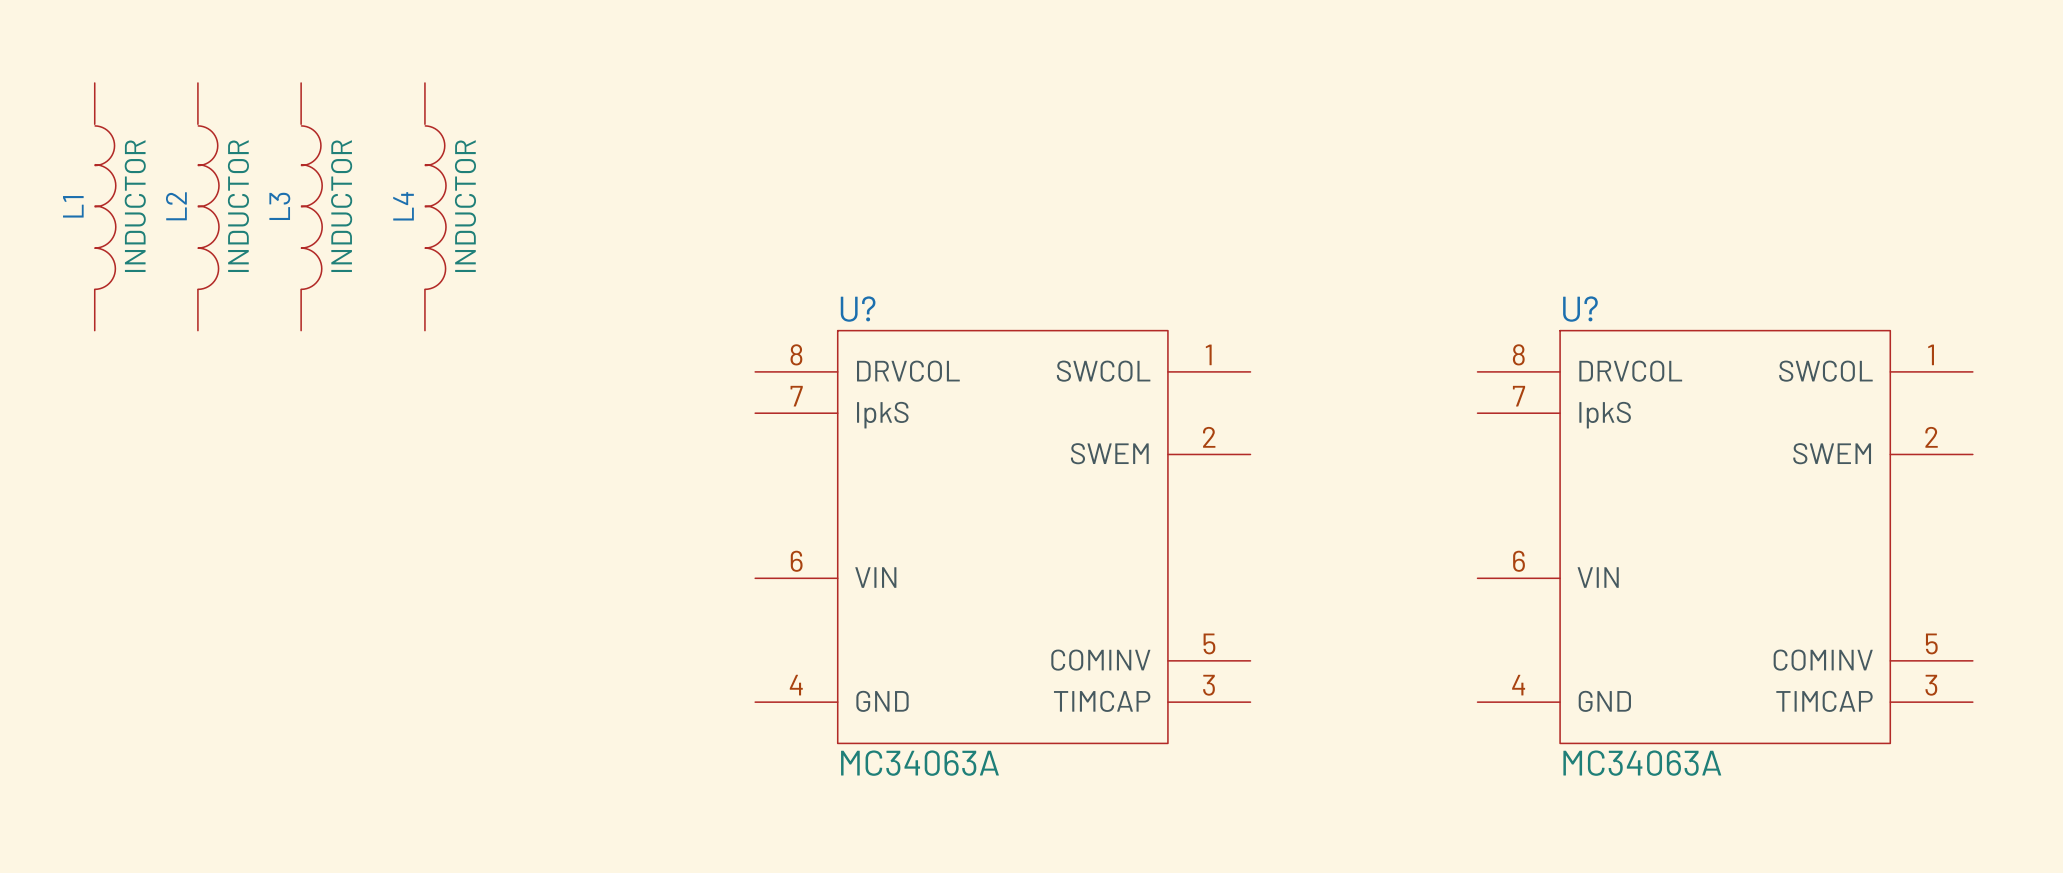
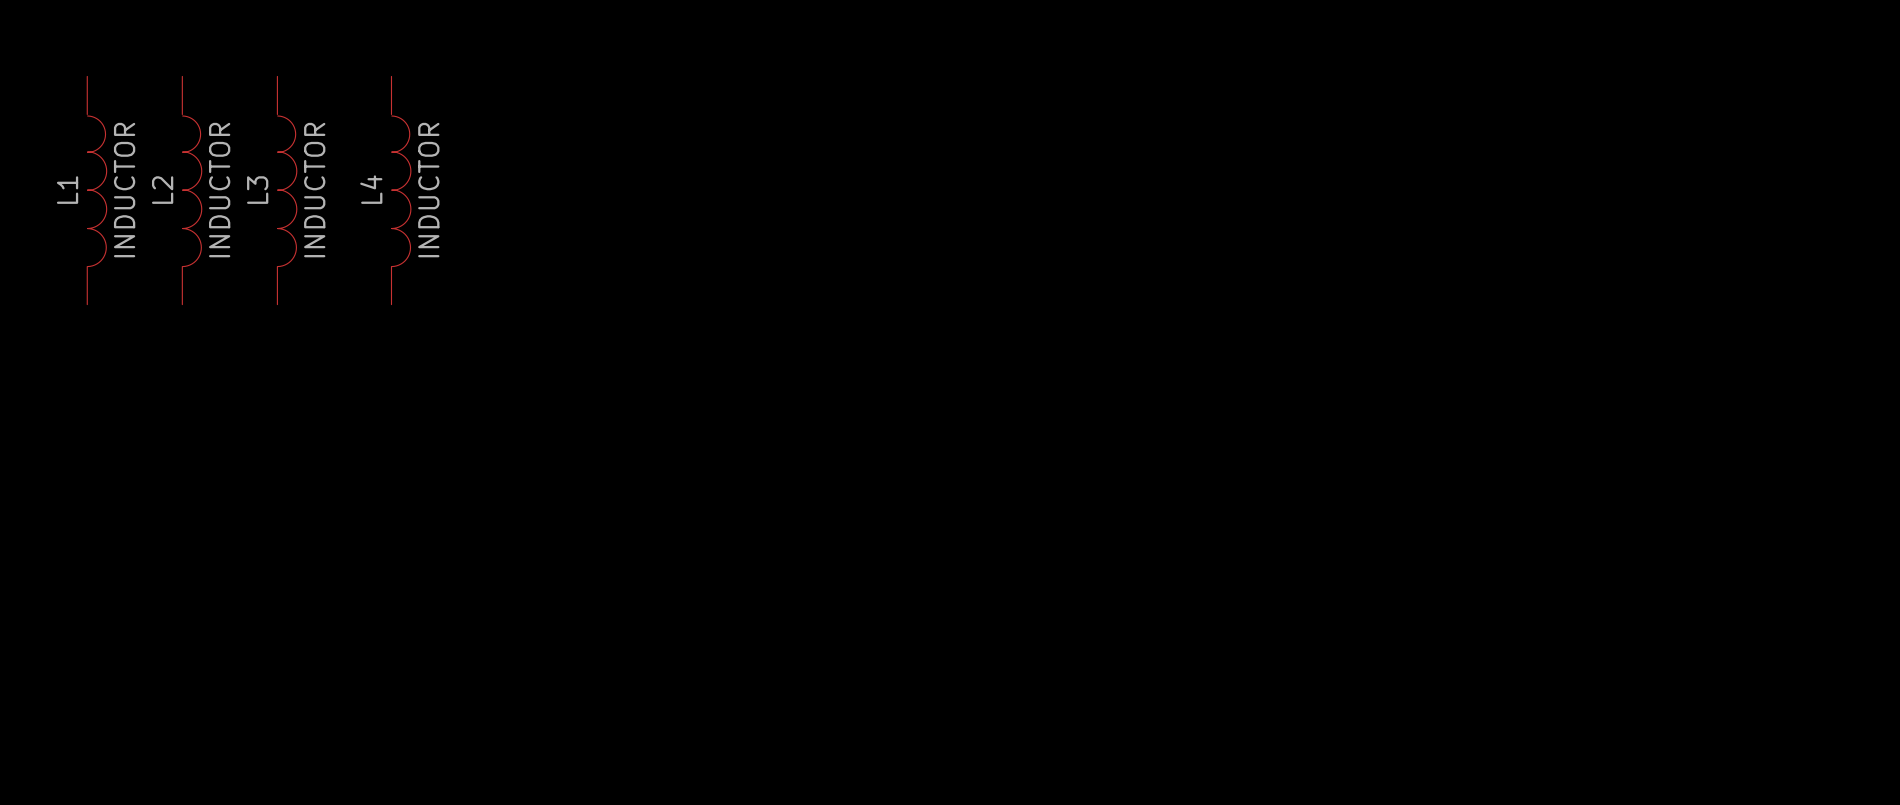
U?: MC34063A (1002, 537) -> none
U?: MC34063A (1725, 537) -> none

